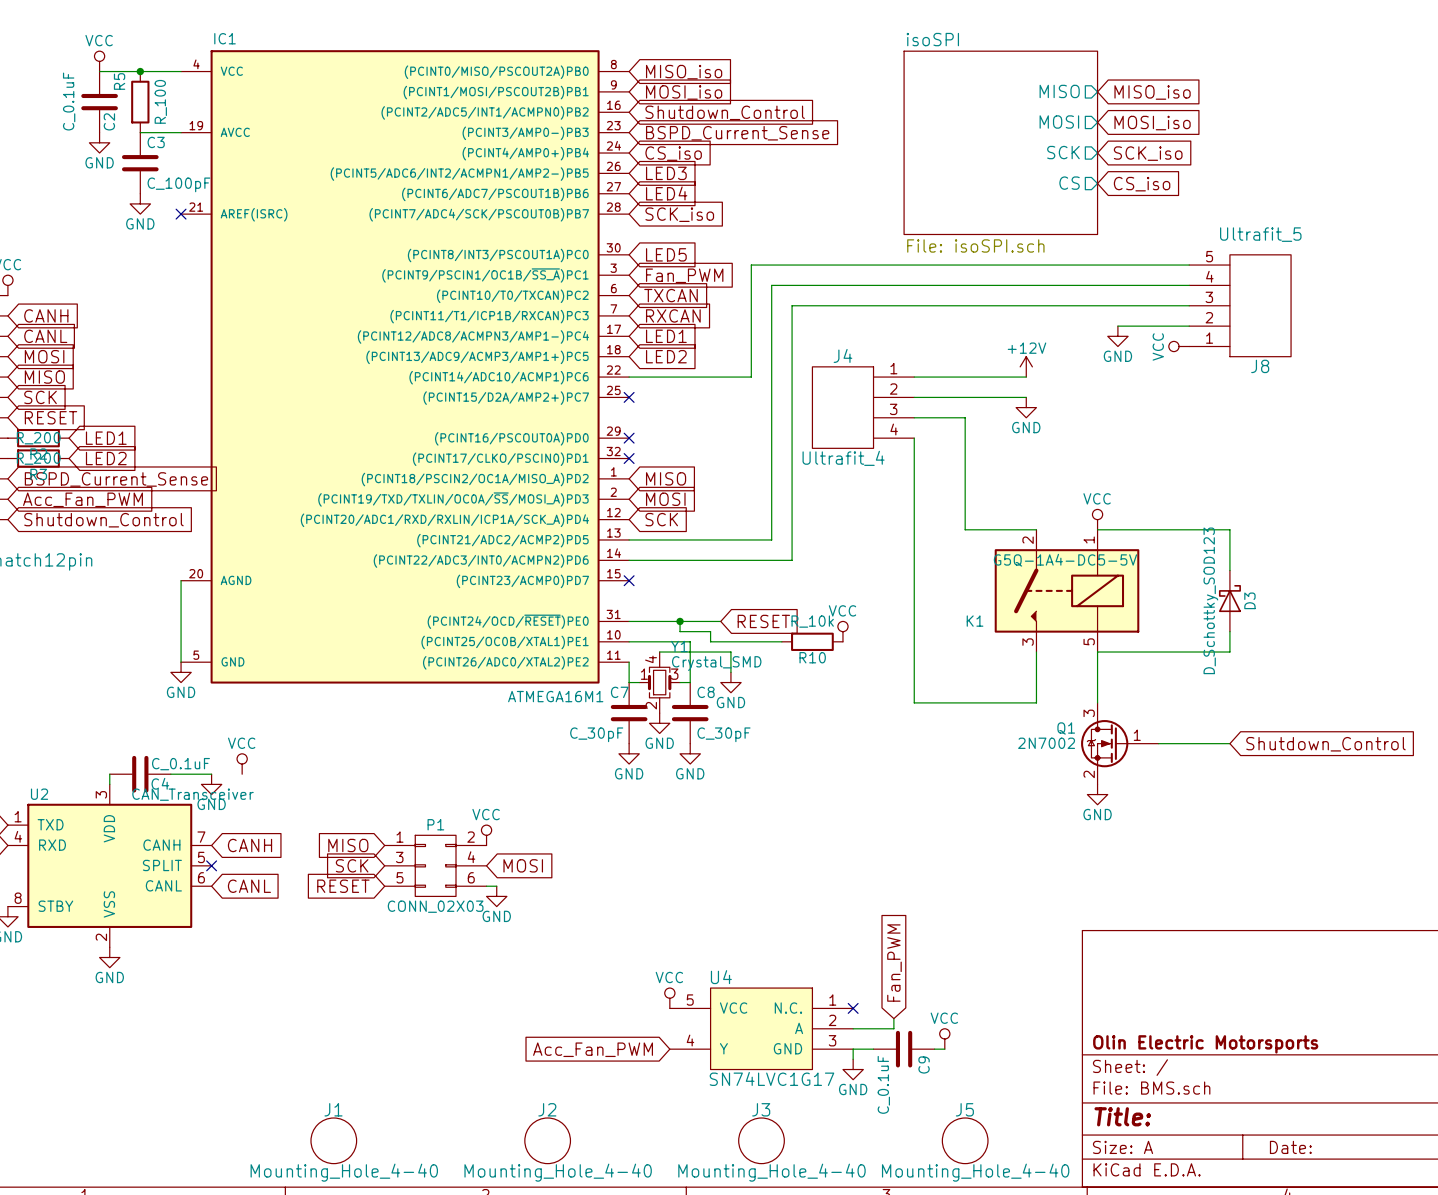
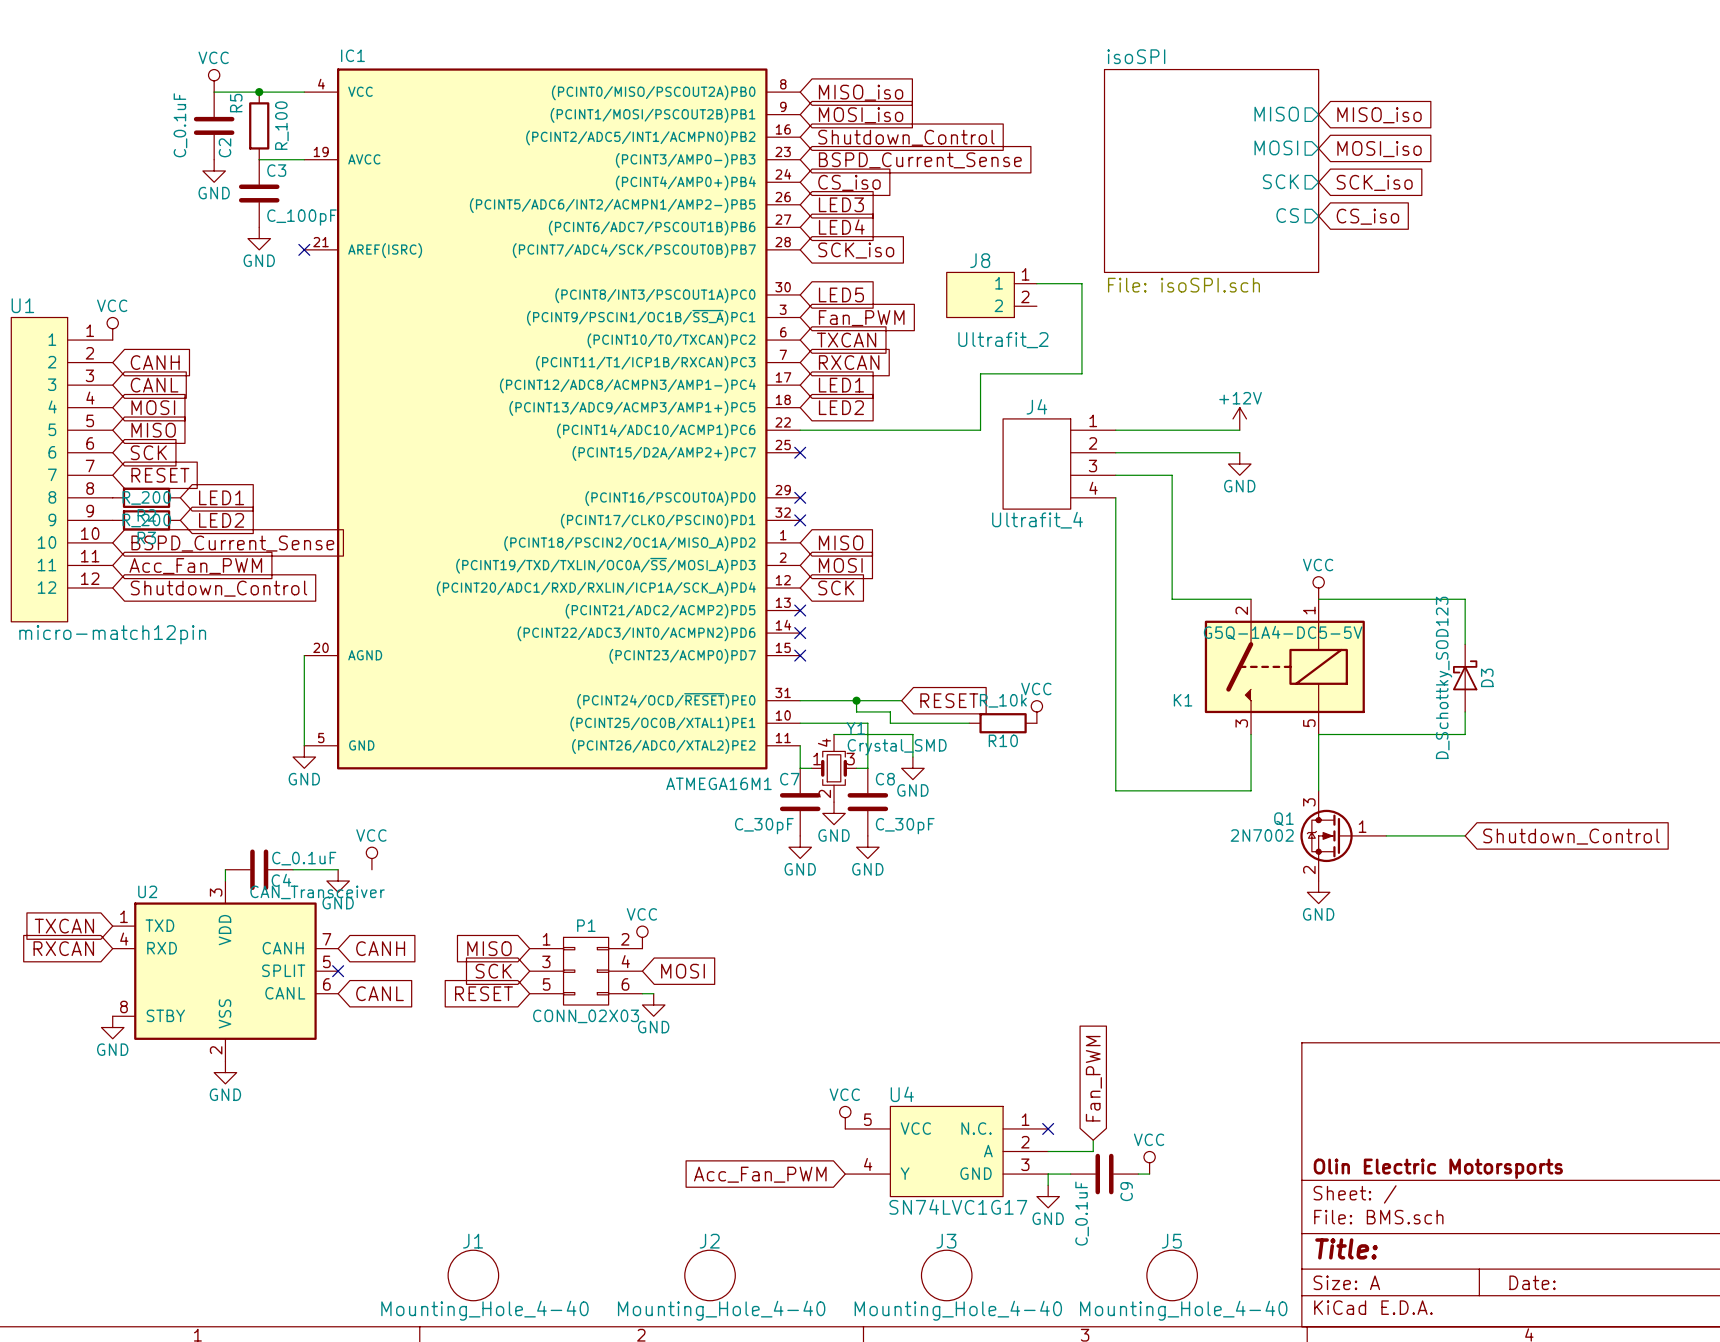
J8 value: Ultrafit_5 (1260, 234) -> Ultrafit_2 (1003, 340)
J8 symbol: [1189, 254, 1292, 357] -> [946, 272, 1037, 318]
wire: (1189, 265) (751, 265) (751, 377) -> none
wire: (1189, 285) (771, 285) (771, 539) (629, 539) -> none
wire: (1189, 305) (792, 305) (792, 326) -> (1036, 283) (1081, 283) (1081, 373) (980, 373)
wire: (1117, 326) (1189, 326) -> none
power symbol: GND (1117, 336) -> none
power symbol: VCC (1179, 346) -> none
J8 name position: J8 (1260, 366) -> J8 (980, 260)
wire: (792, 377) (792, 560) (629, 560) -> (980, 430) (935, 430)
no-connect mark: none -> (800, 610)
no-connect mark: none -> (800, 633)

